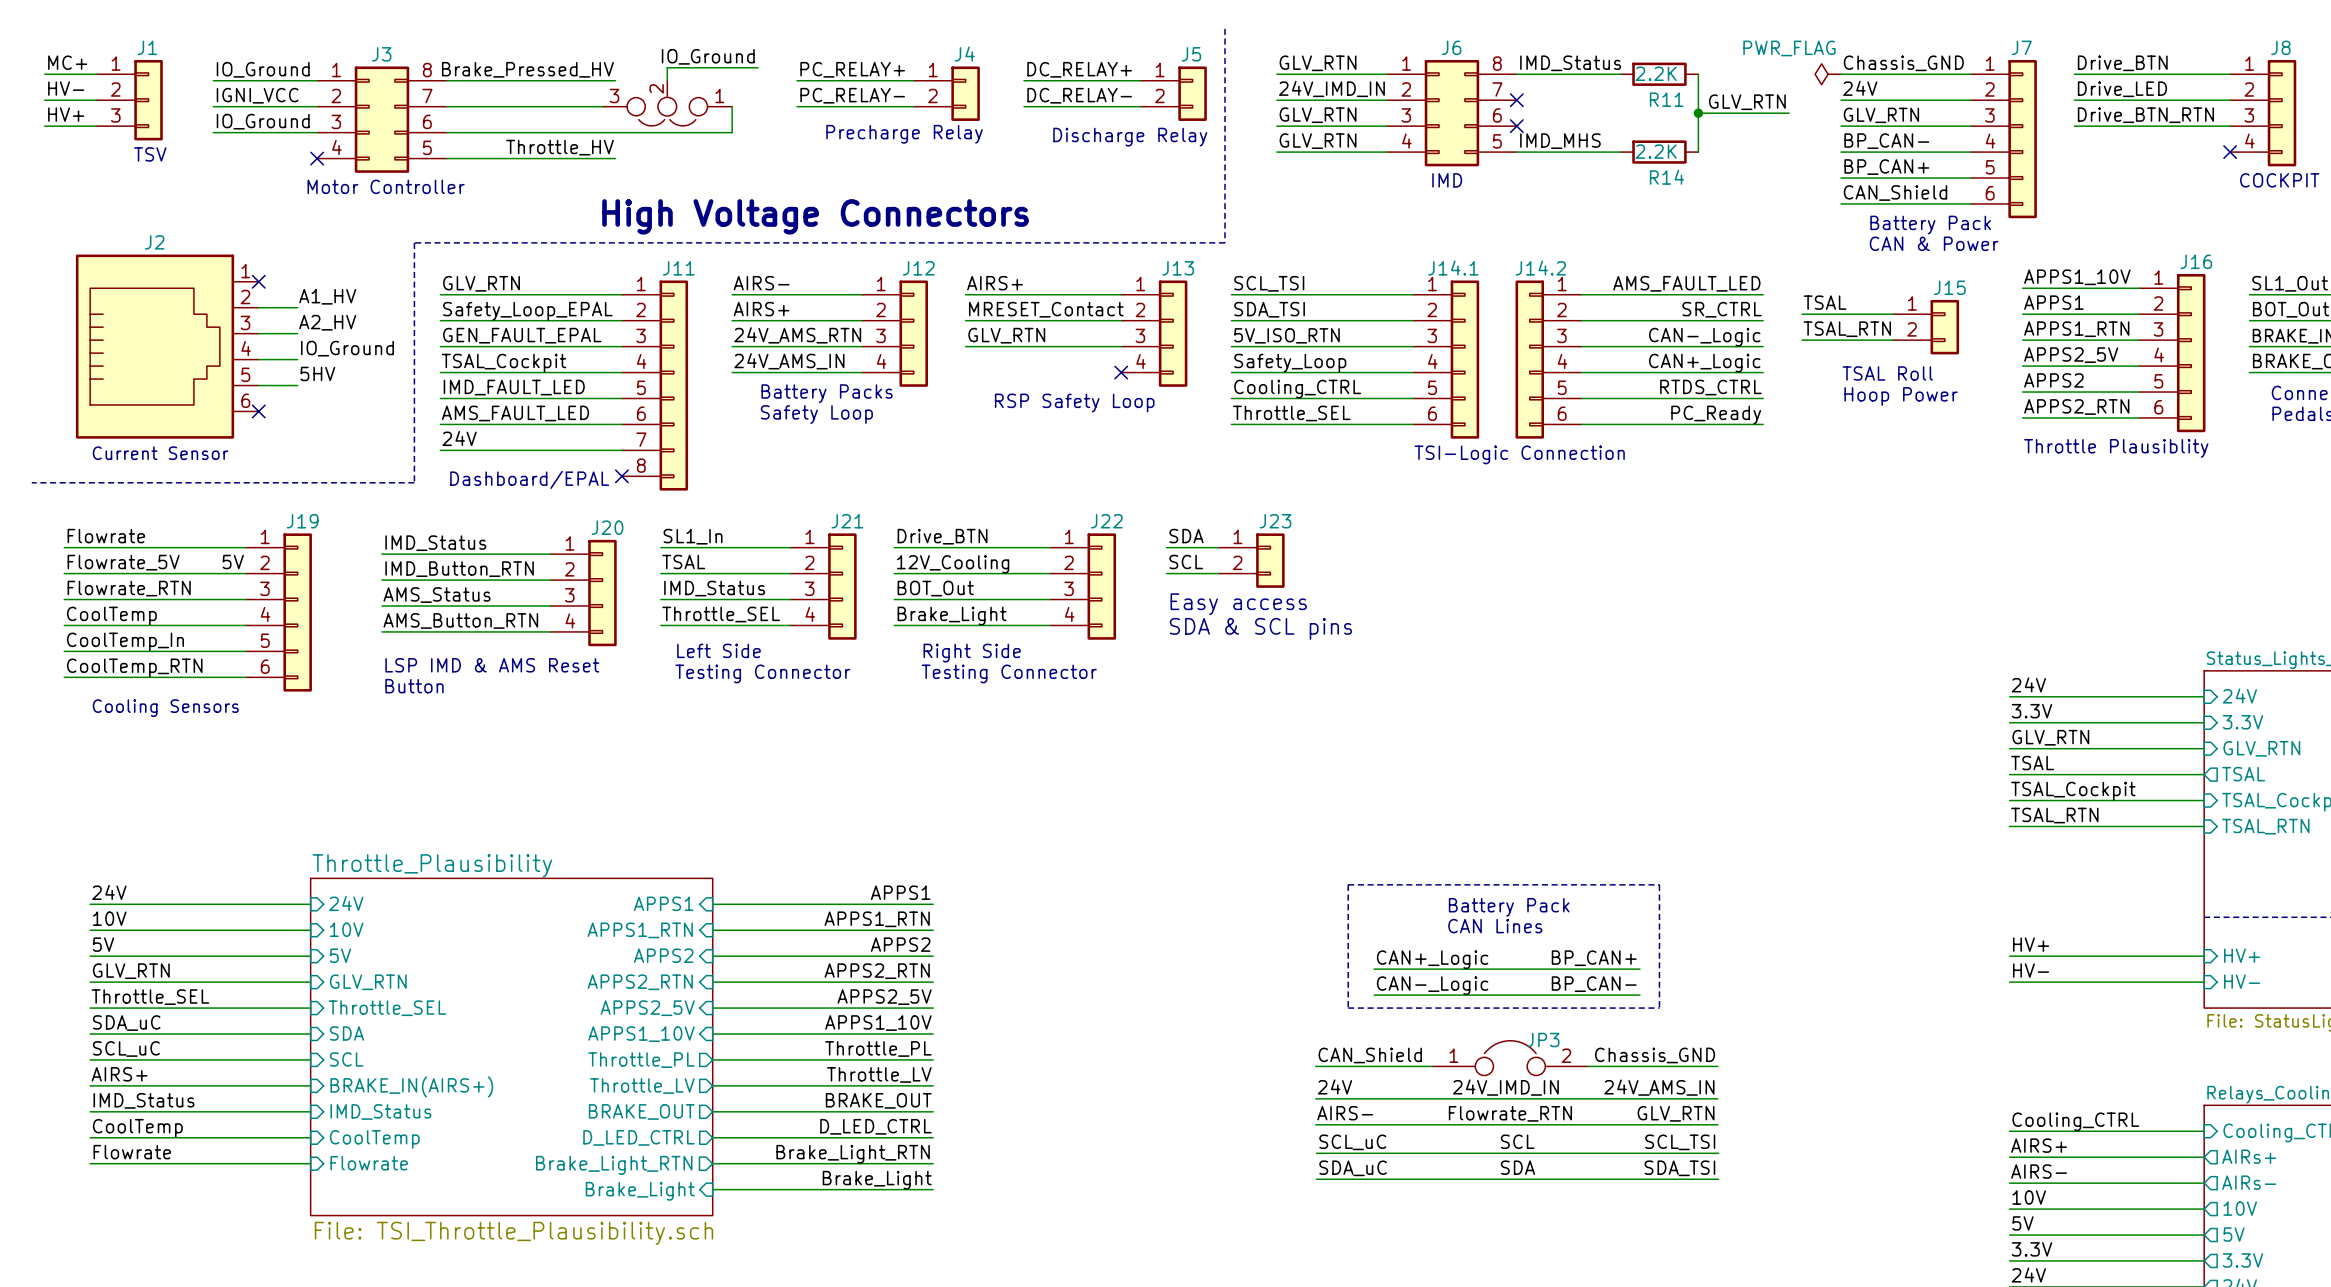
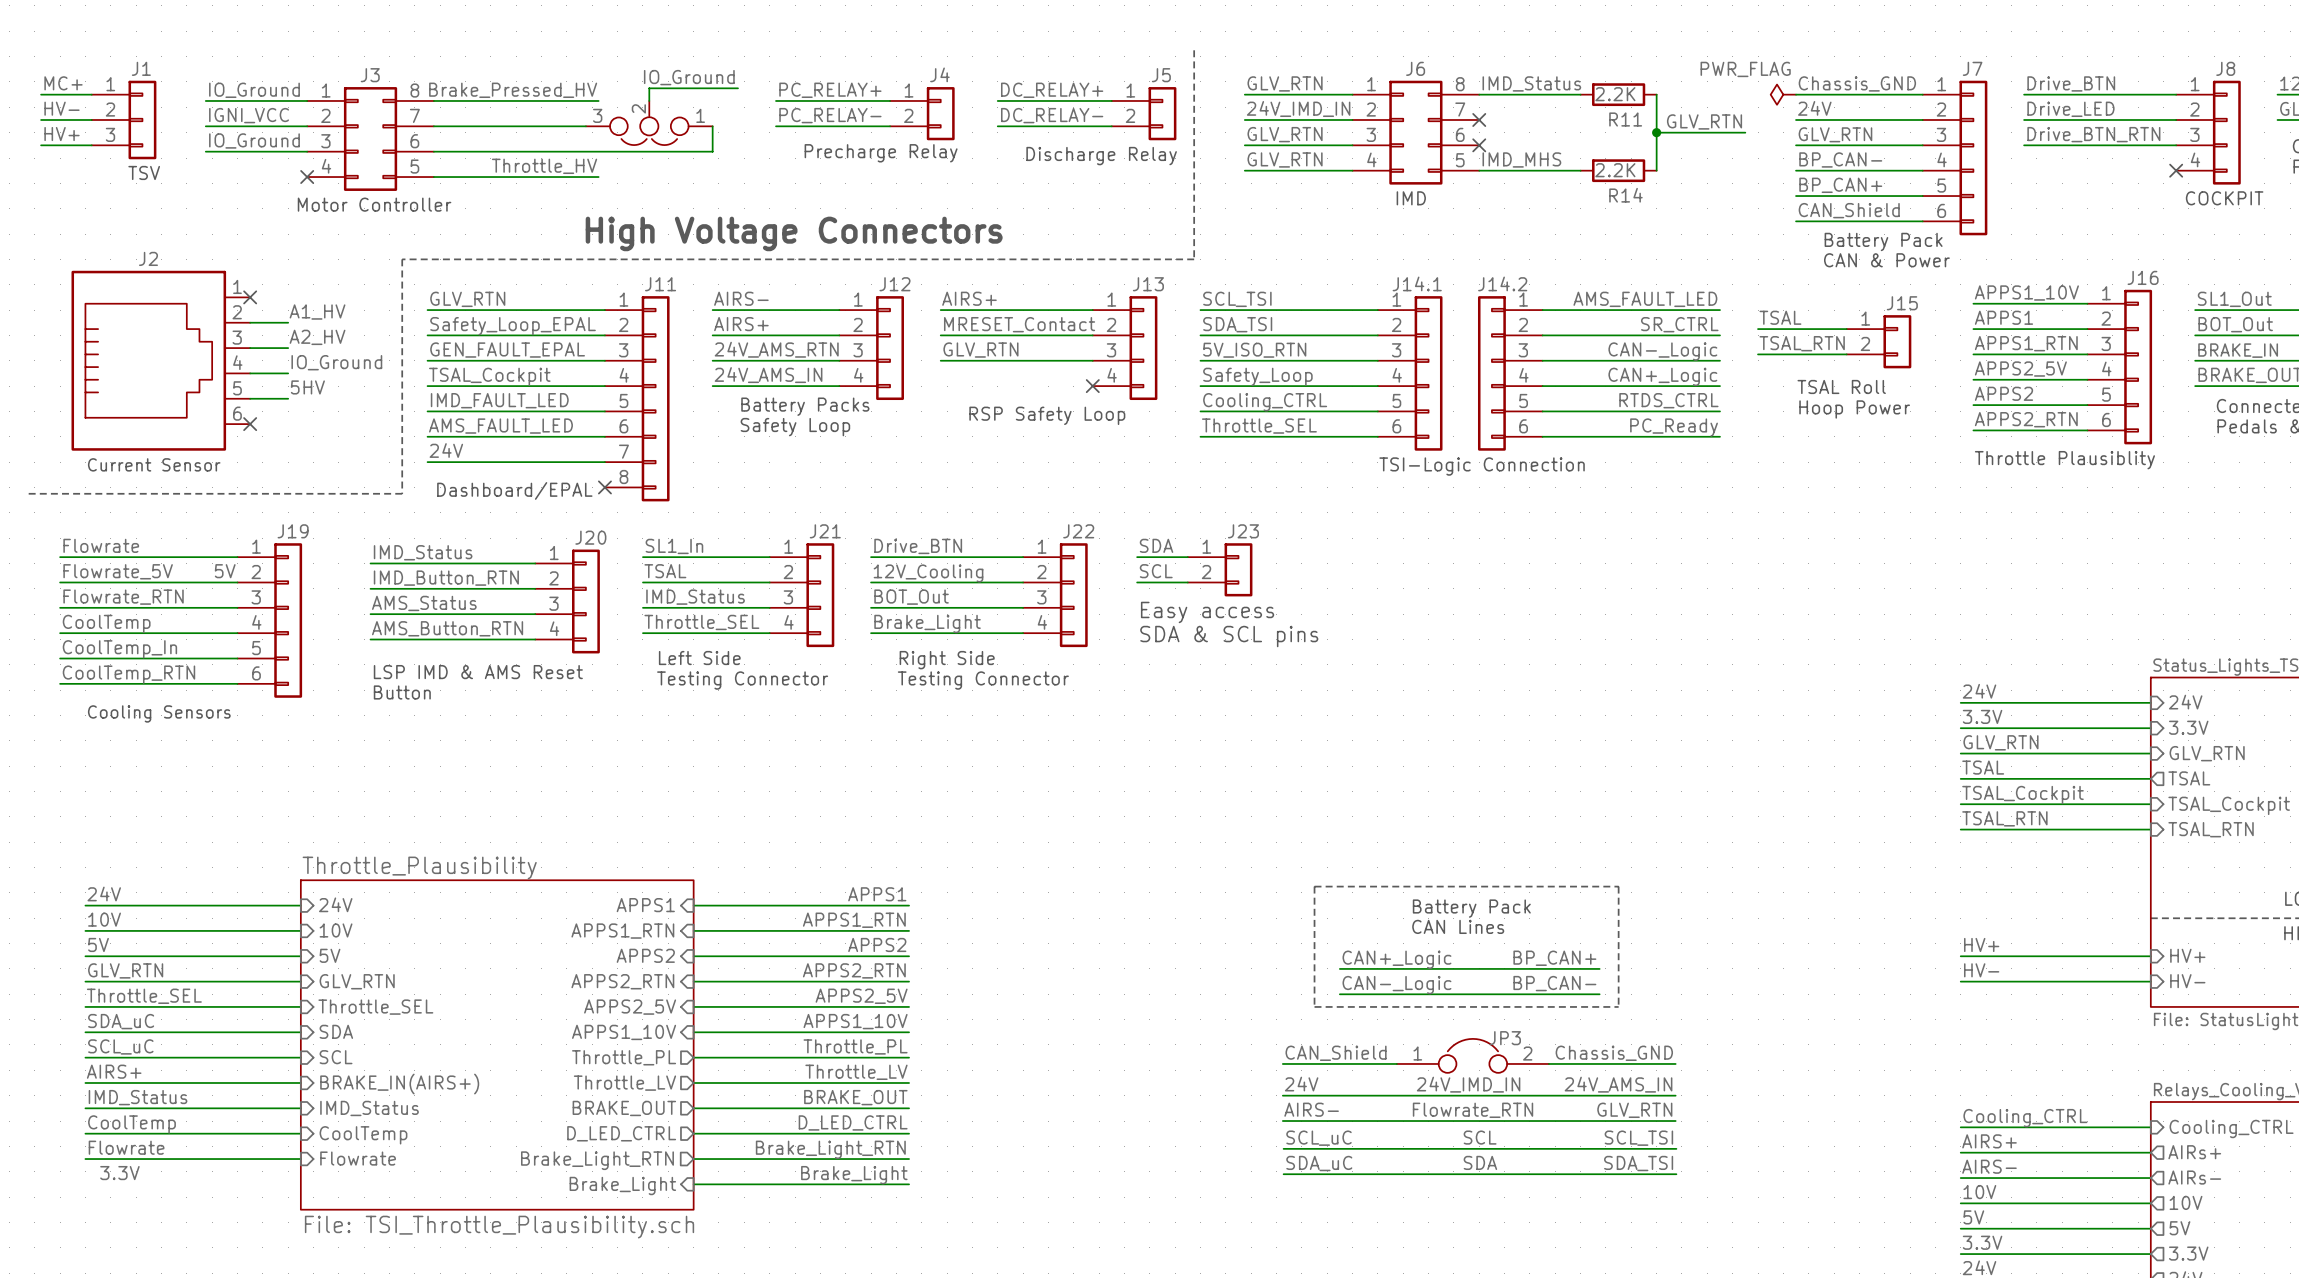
label: none -> 3.3V (119, 1173)

